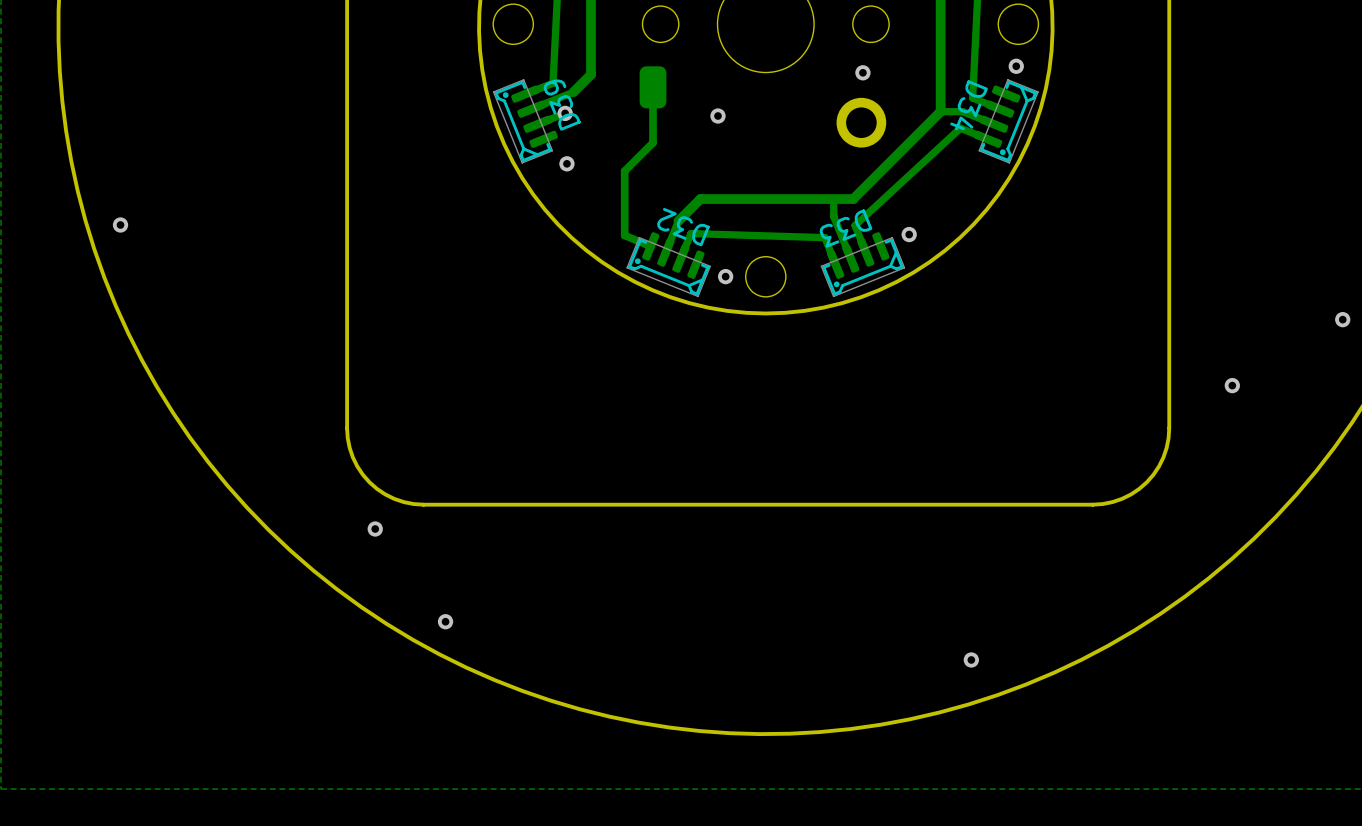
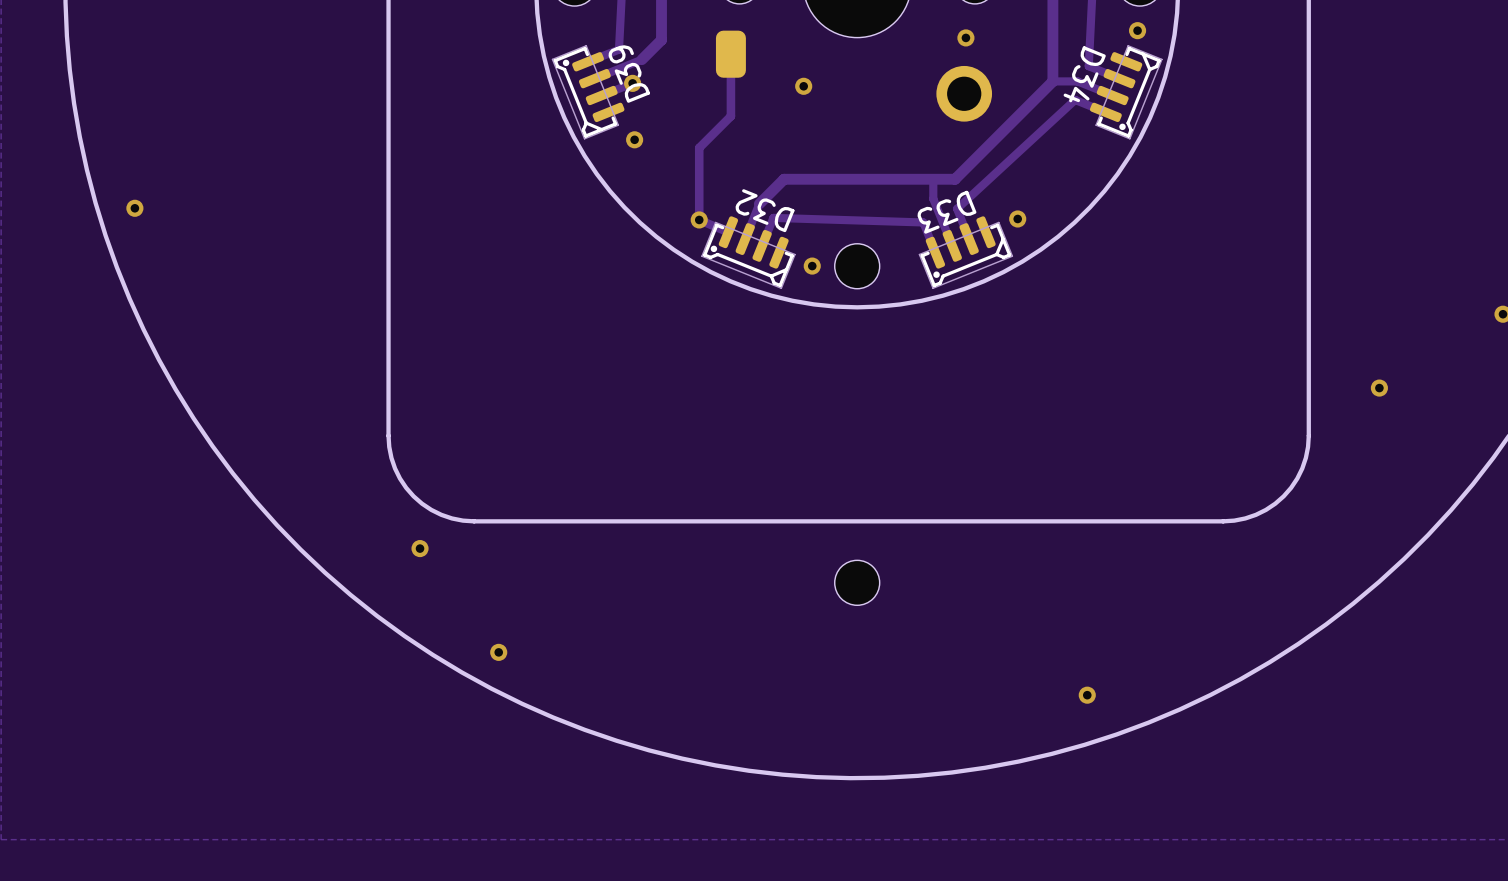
via: none -> (699, 219)
part: none -> (857, 582)

